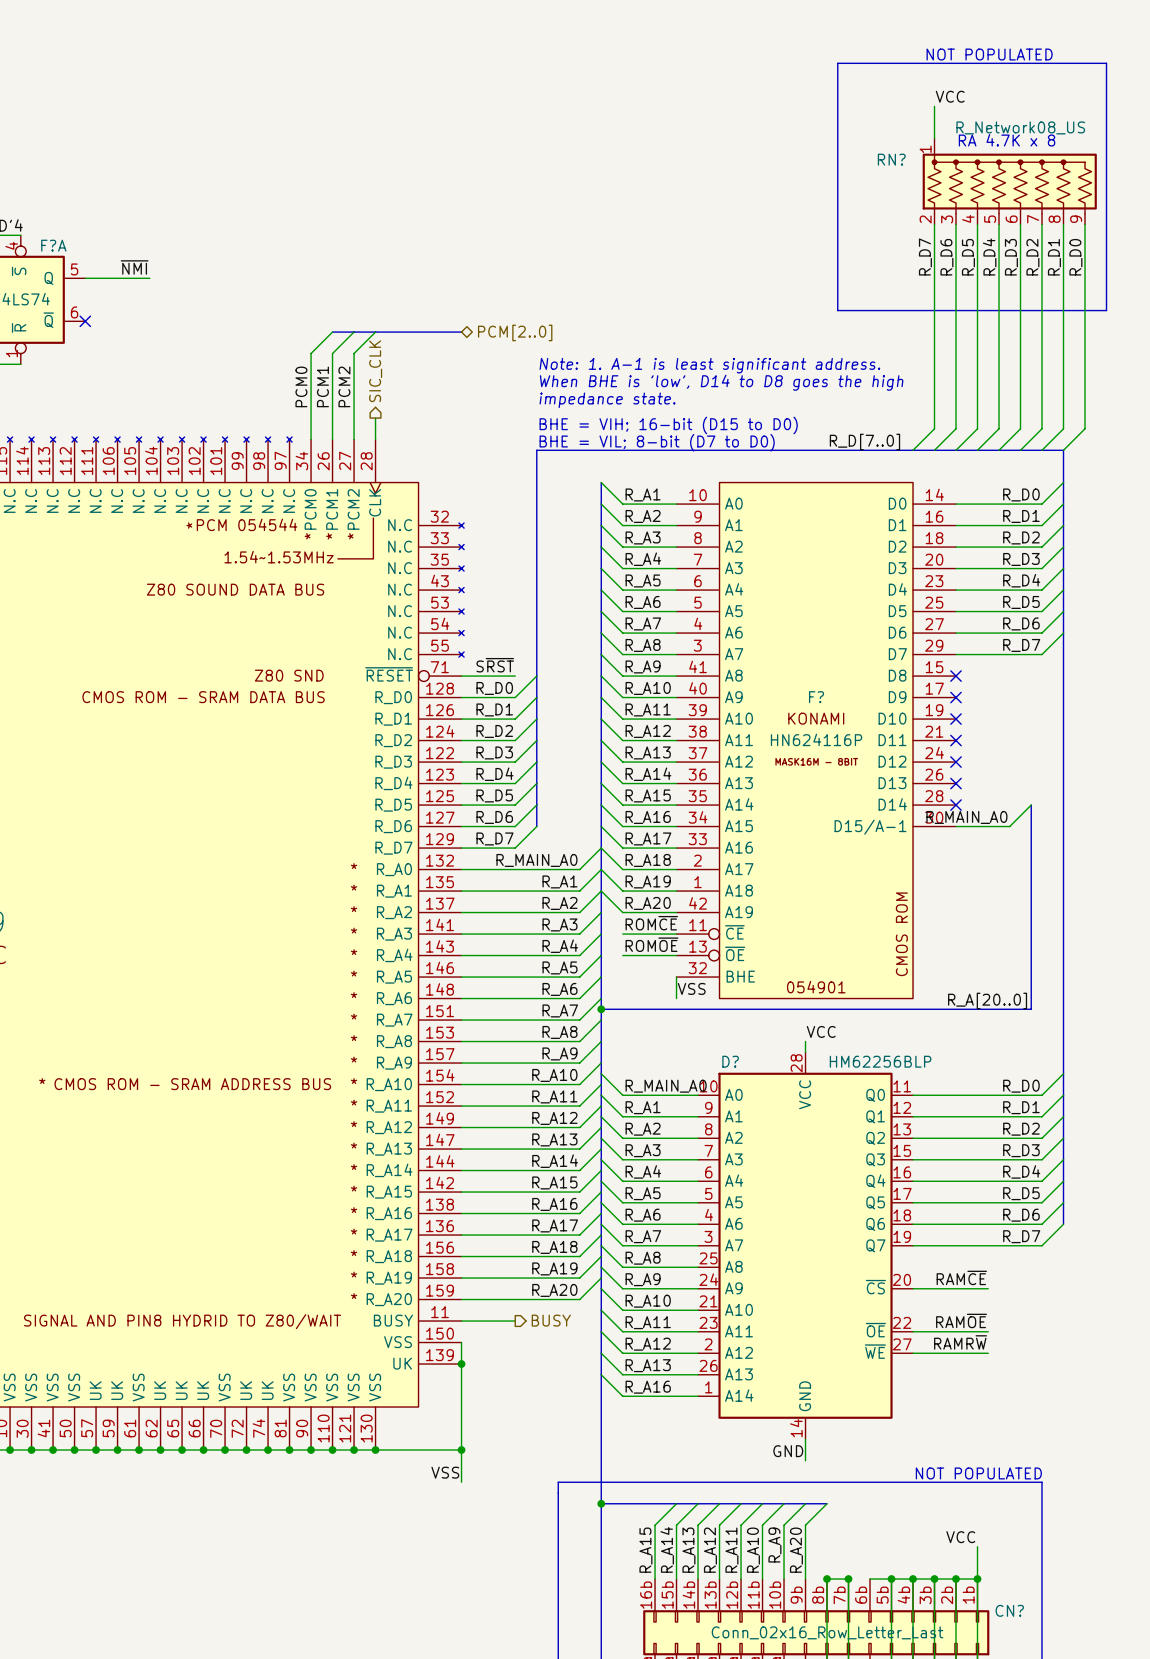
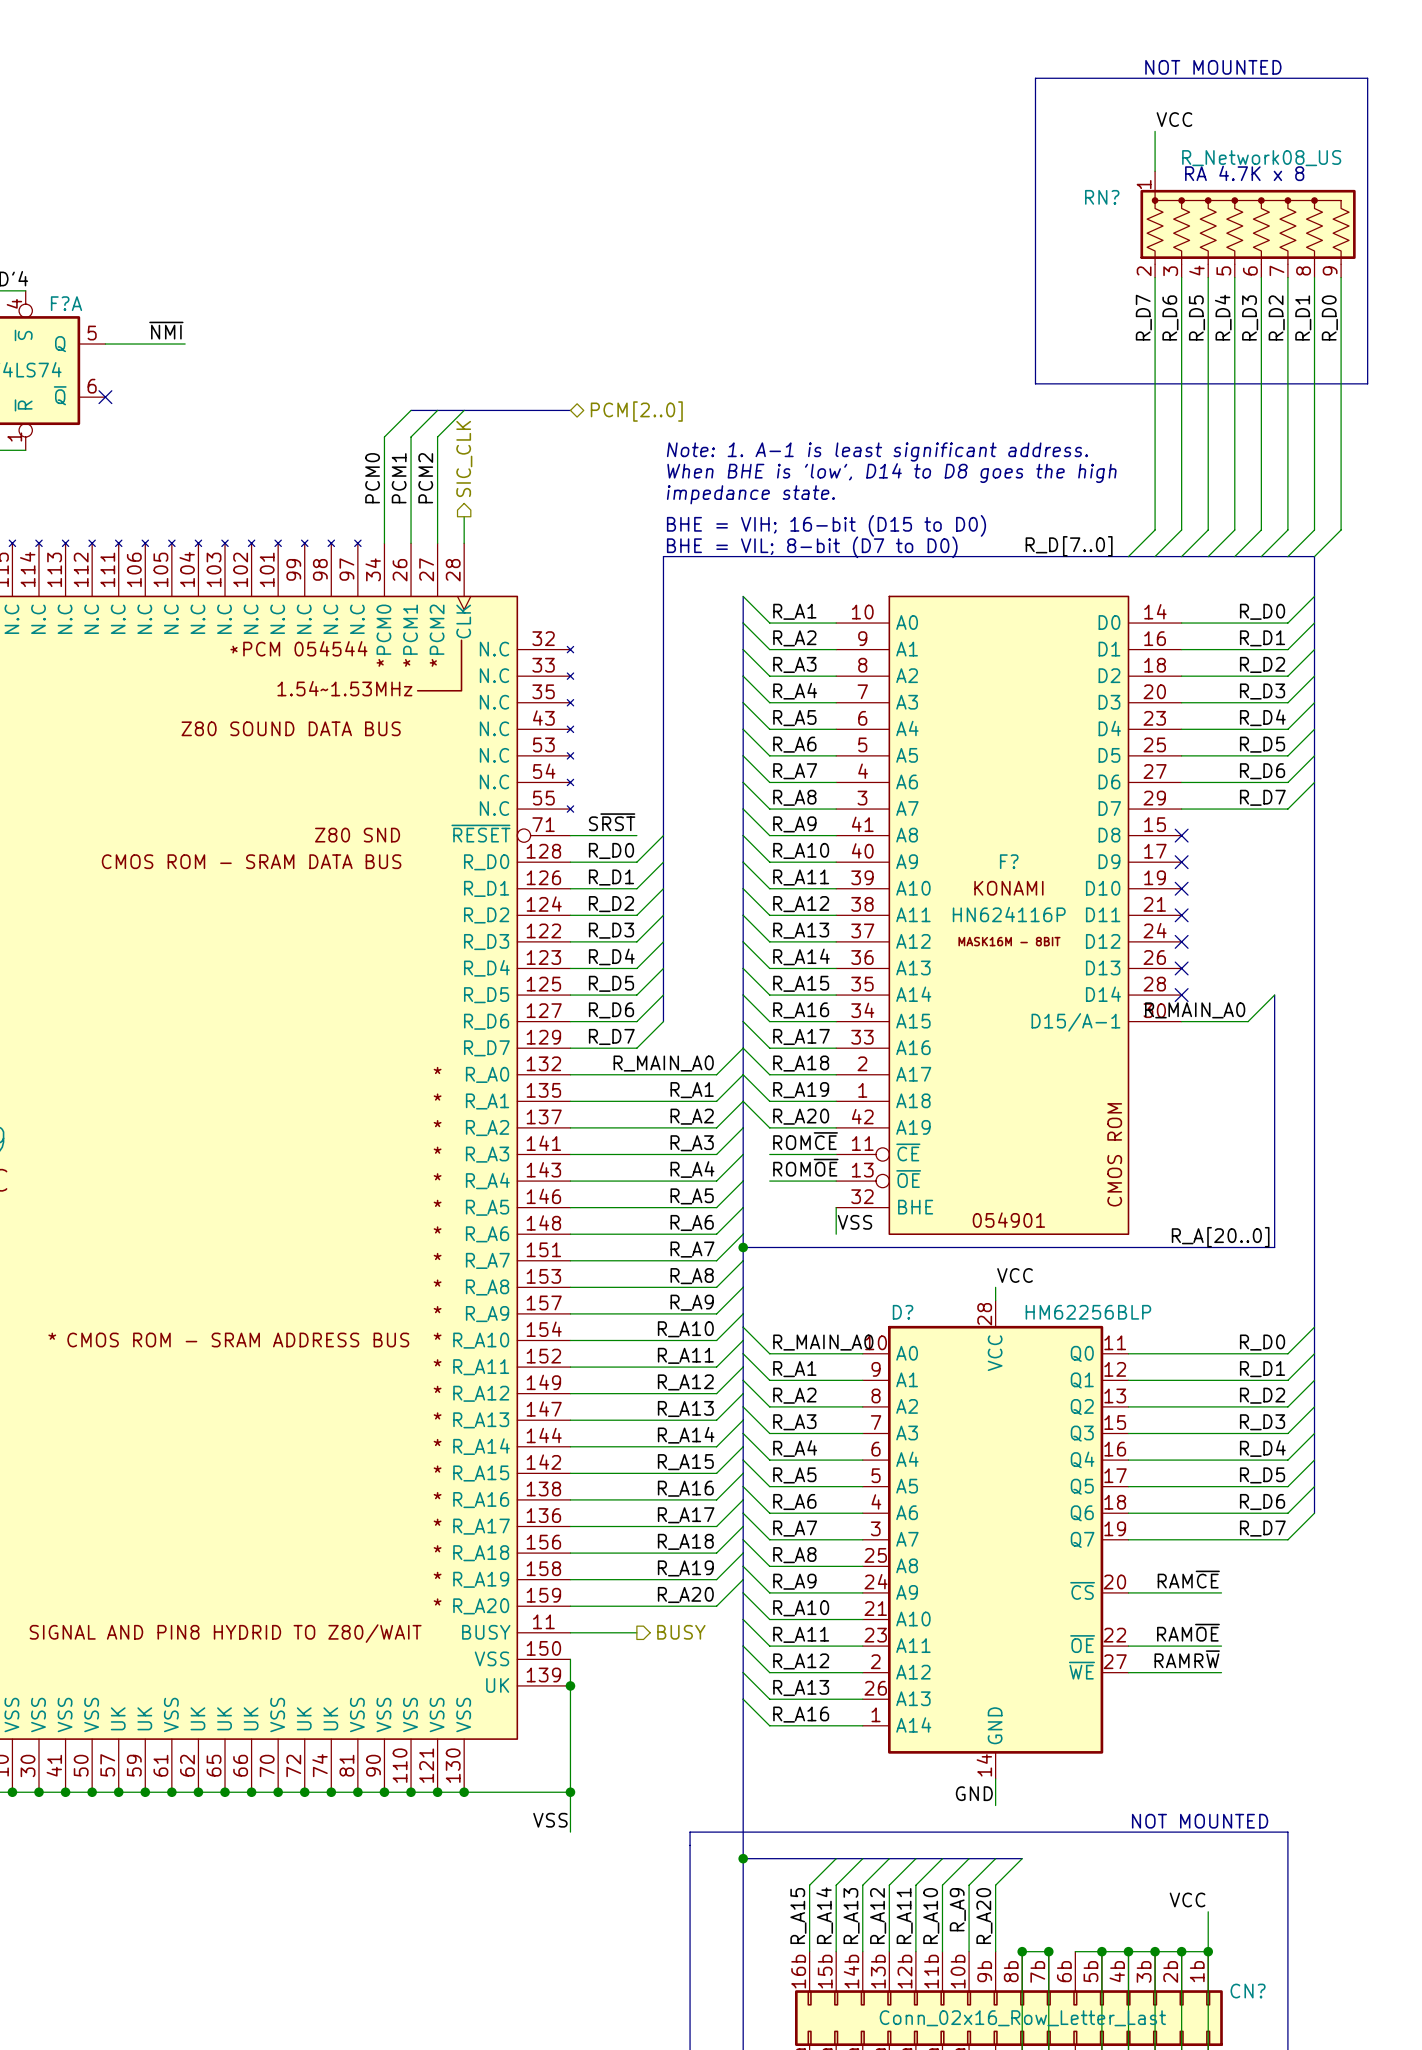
text: NOT POPULATED (989, 54) -> NOT MOUNTED (1213, 67)
text: NOT POPULATED (978, 1473) -> NOT MOUNTED (1200, 1821)

